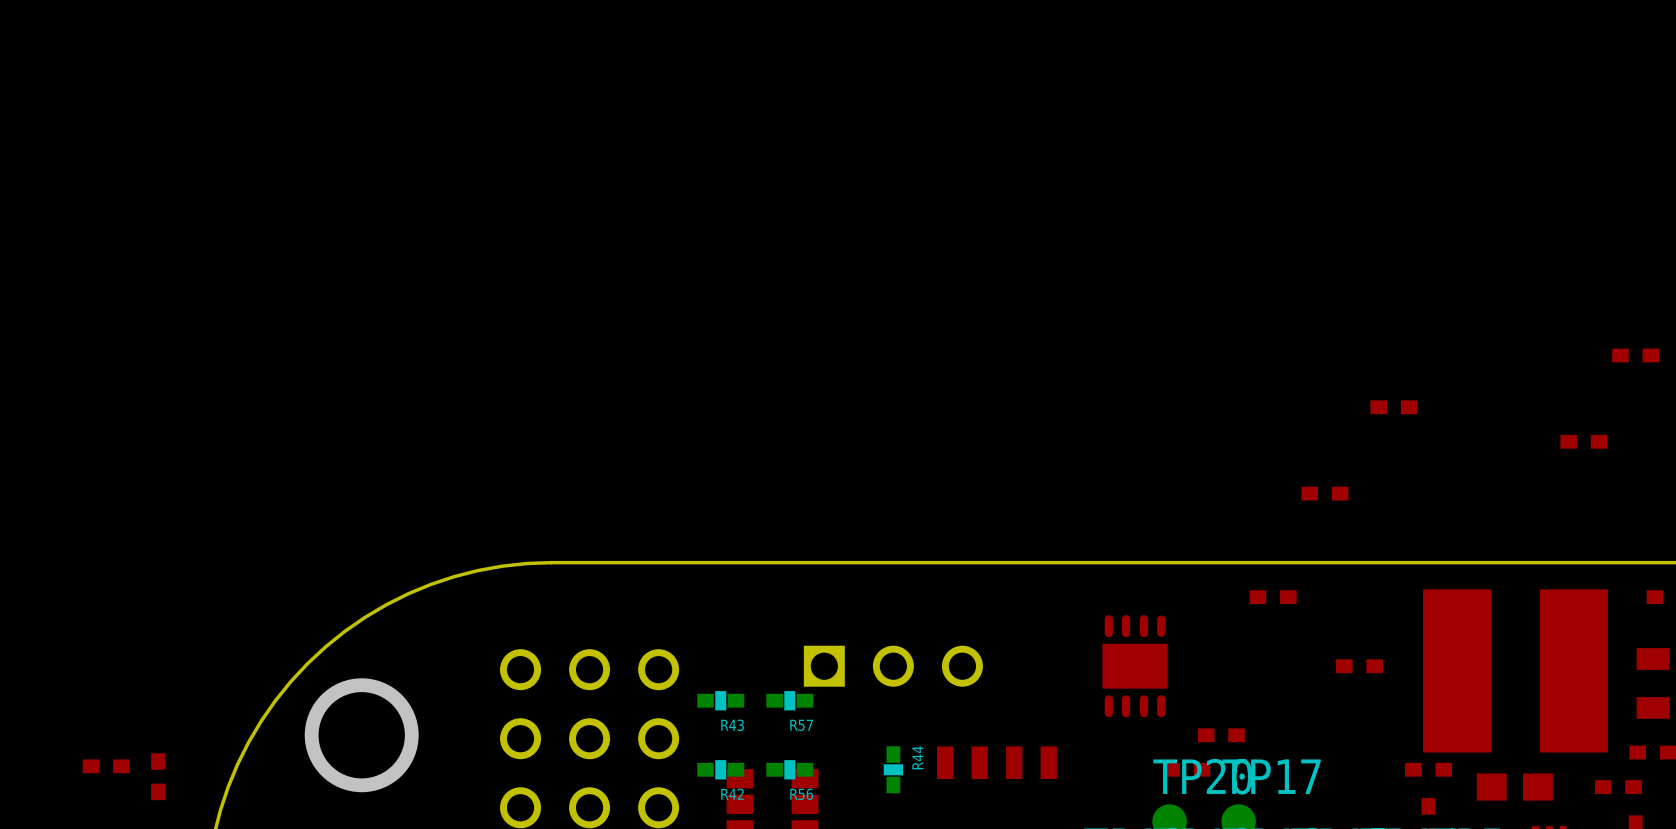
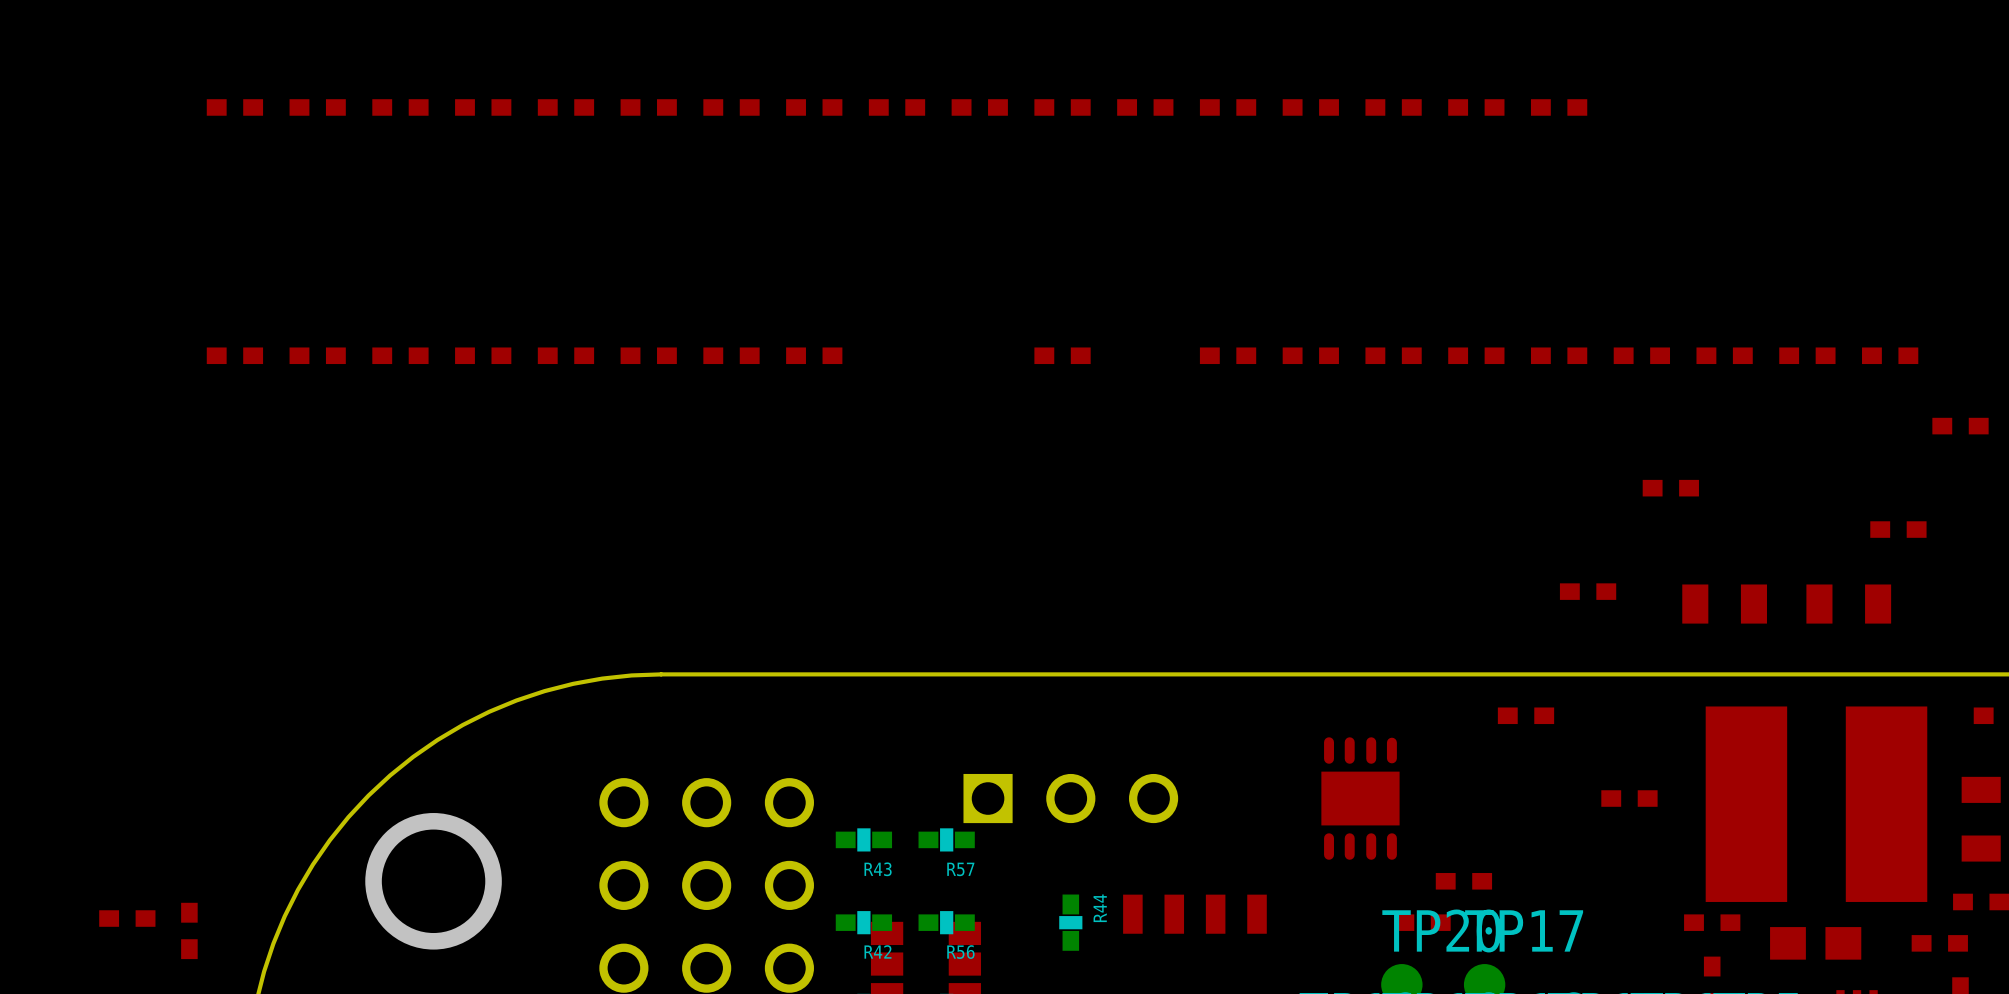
part: none -> (234, 107)
part: none -> (317, 107)
part: none -> (400, 107)
part: none -> (483, 107)
part: none -> (565, 107)
part: none -> (648, 107)
part: none -> (731, 107)
part: none -> (814, 107)
part: none -> (897, 107)
part: none -> (979, 107)
part: none -> (1062, 107)
part: none -> (1145, 107)
part: none -> (1228, 107)
part: none -> (1310, 107)
part: none -> (1393, 107)
part: none -> (1476, 107)
part: none -> (1559, 107)
part: none -> (234, 355)
part: none -> (317, 355)
part: none -> (400, 355)
part: none -> (483, 355)
part: none -> (565, 355)
part: none -> (648, 355)
part: none -> (731, 355)
part: none -> (814, 355)
part: none -> (1062, 355)
part: none -> (1228, 355)
part: none -> (1310, 355)
part: none -> (1393, 355)
part: none -> (1476, 355)
part: none -> (1559, 355)
part: none -> (1641, 355)
part: none -> (1724, 355)
part: none -> (1807, 355)
part: none -> (1890, 355)
part: none -> (1724, 604)
part: none -> (1848, 604)

